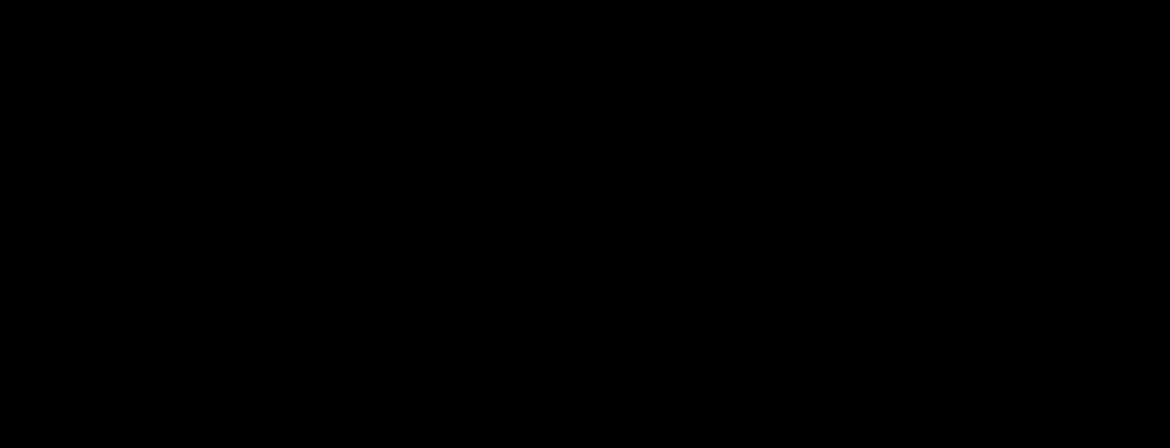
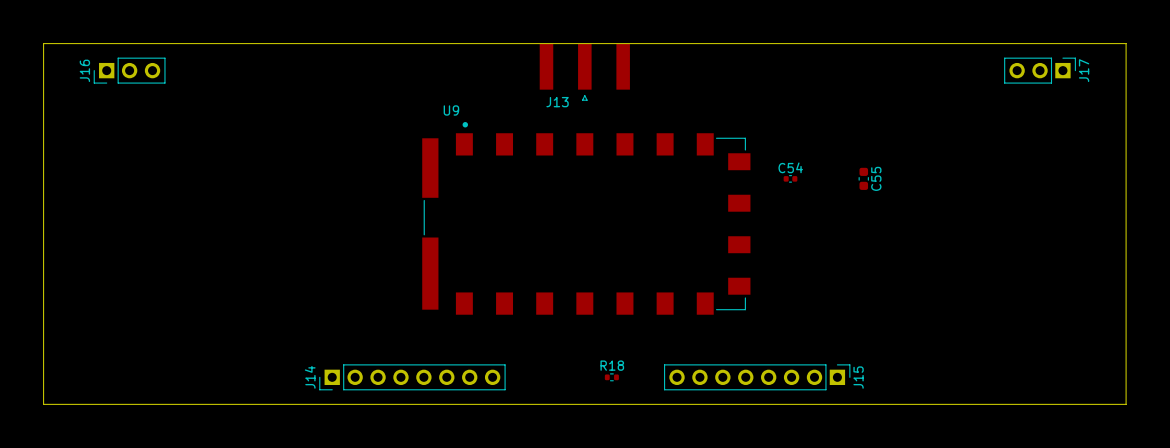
board edge: none -> (43, 43) (1126, 43) (1126, 404) (43, 404) (43, 43)
J16: none -> (129, 70)
J17: none -> (1040, 70)
J13: none -> (584, 72)
C54: none -> (790, 178)
C55: none -> (863, 178)
U9: none -> (586, 218)
J14: none -> (412, 377)
R18: none -> (611, 377)
J15: none -> (757, 377)

